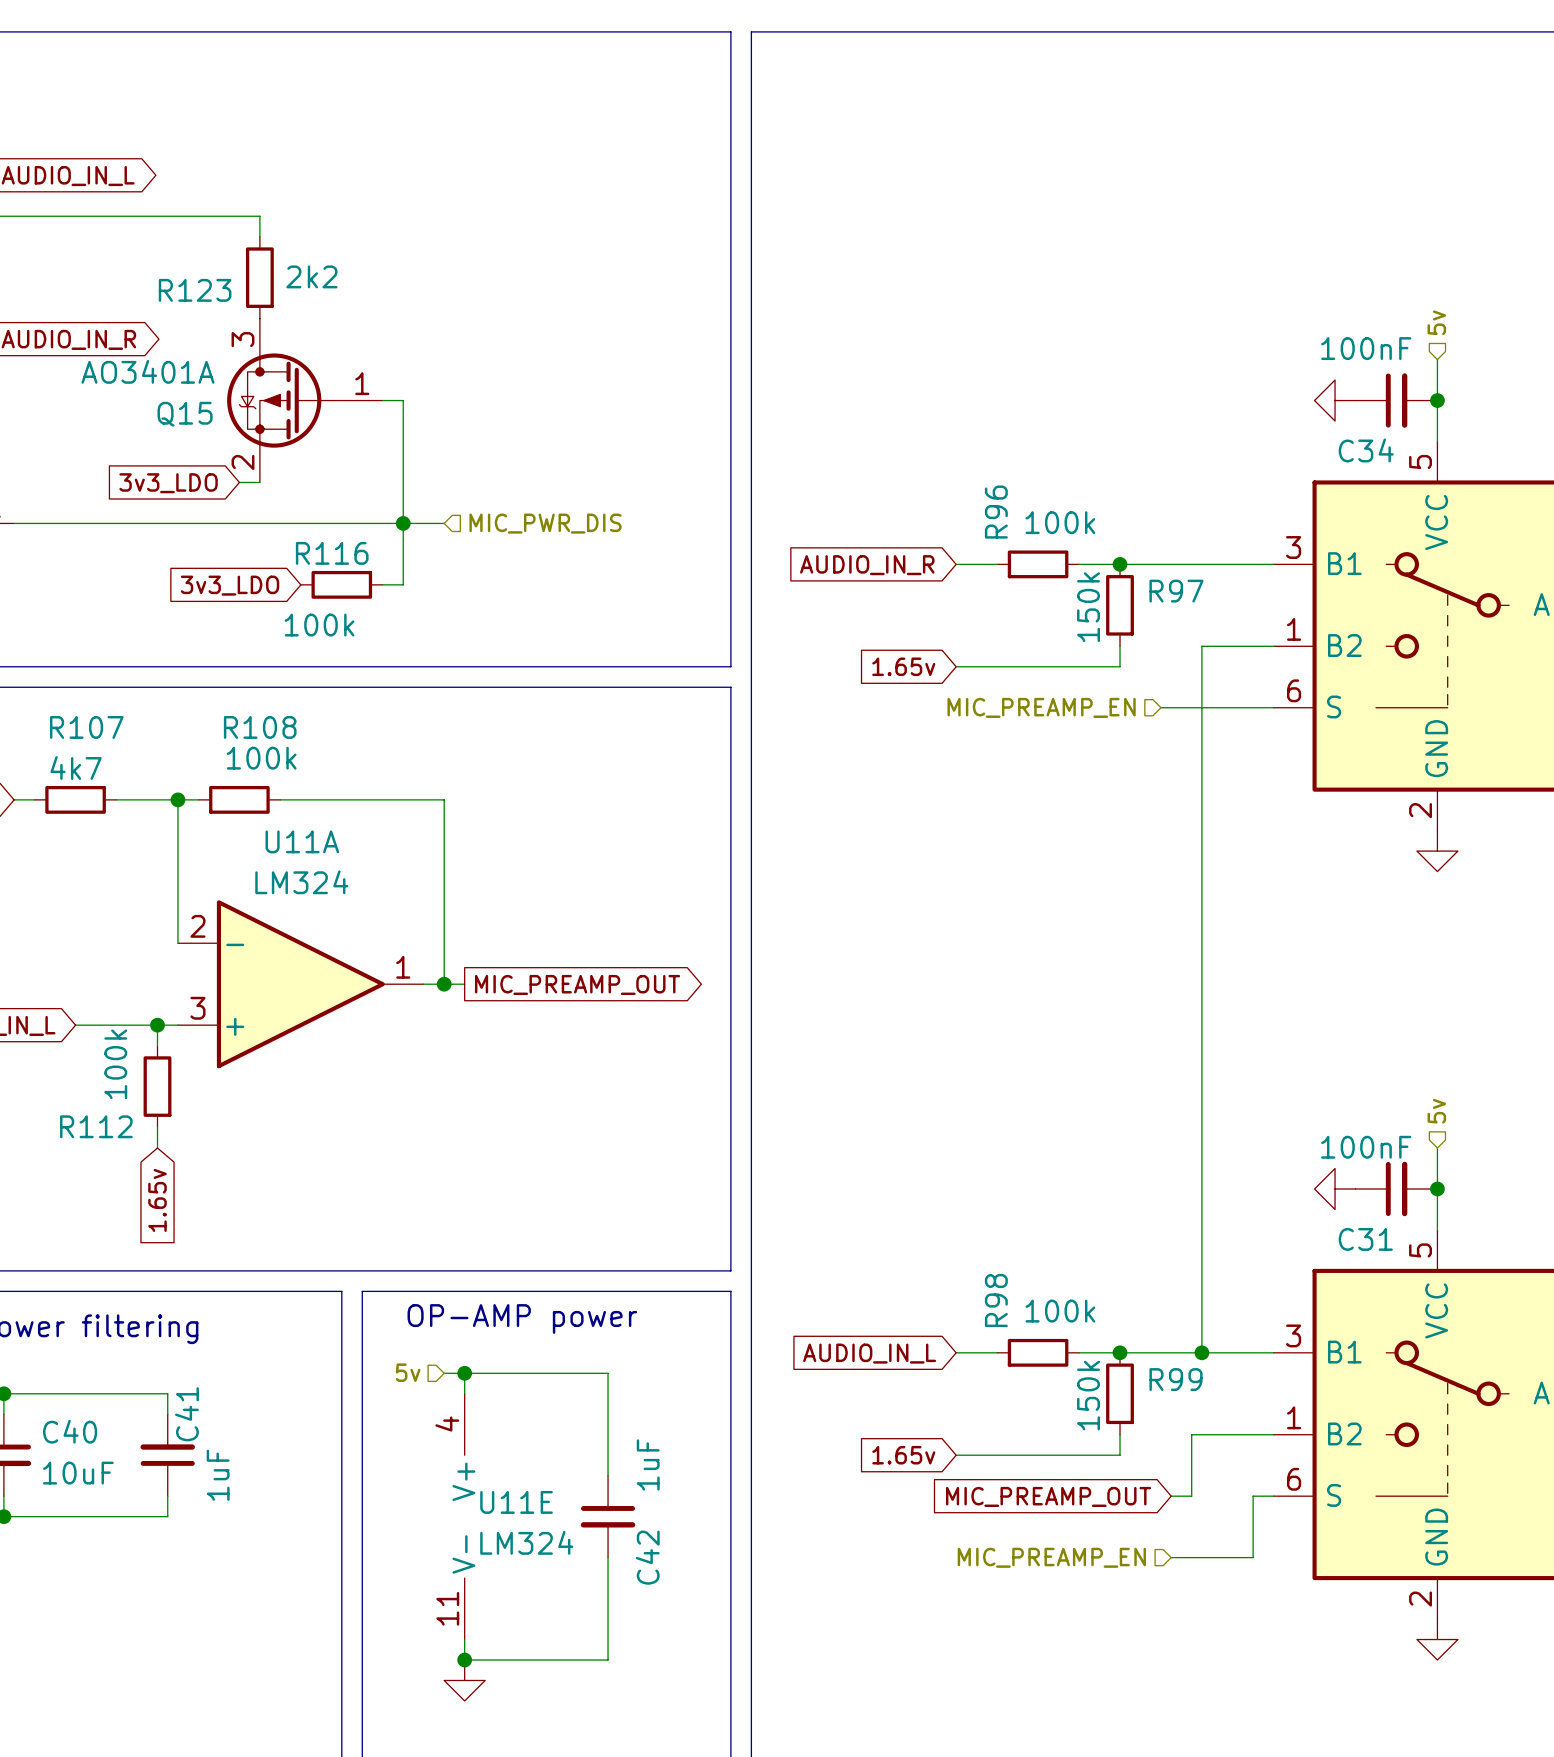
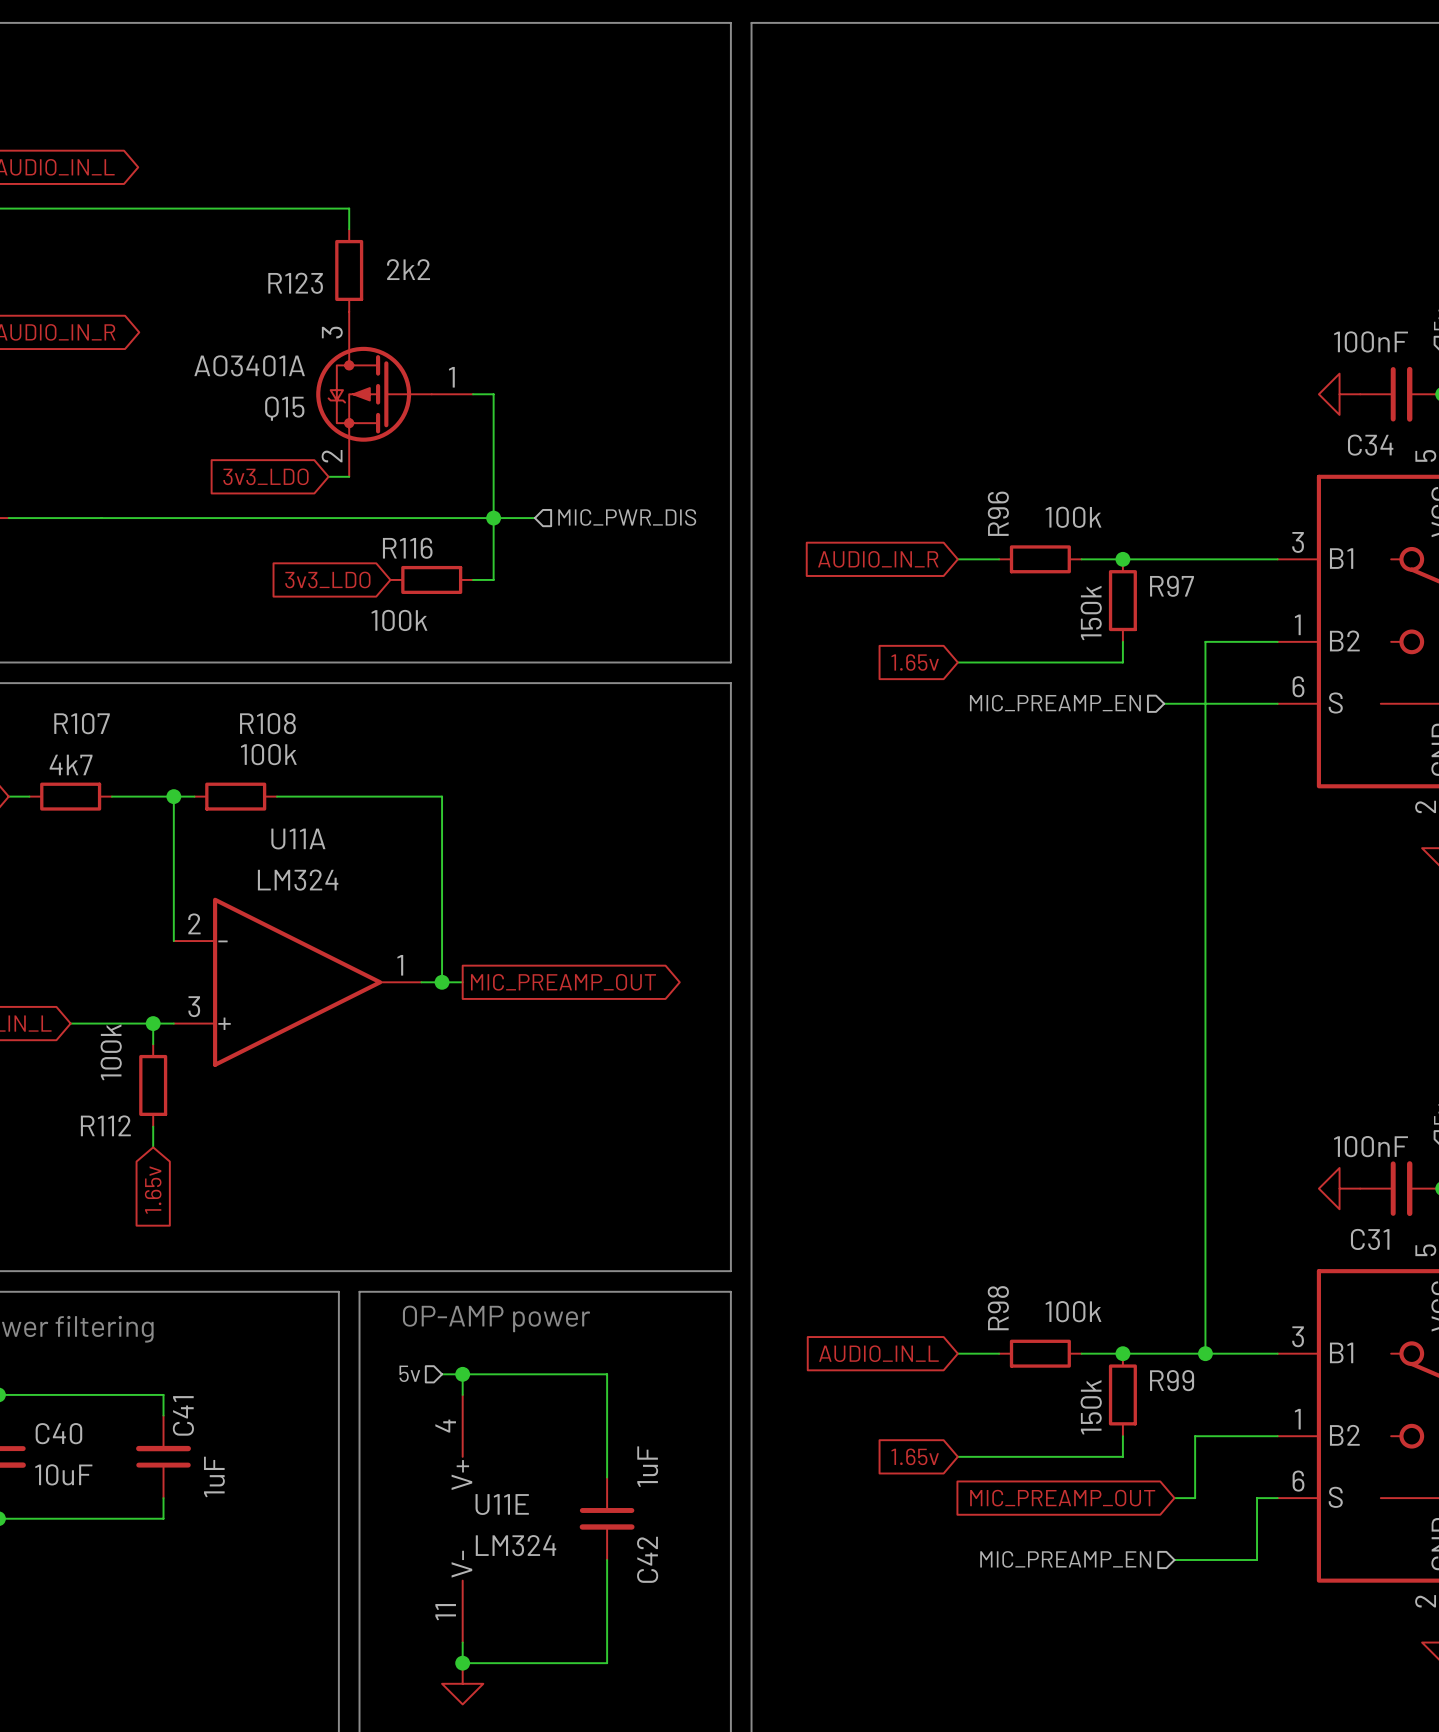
wire: (259, 216) (259, 236) -> (256, 208) (349, 208) (349, 229)
R123 position: (259, 277) -> (349, 270)
Q15 position: (304, 400) -> (394, 394)
wire: (382, 400) (403, 400) (403, 584) (382, 584) -> (473, 394) (493, 394) (493, 579) (473, 579)
wire: (239, 482) (259, 482) -> (328, 476) (349, 476)
global label position: 3v3_LDO (168, 483) -> 3v3_LDO (265, 476)
junction position: (403, 523) -> (493, 518)
wire: none -> (442, 518) (534, 518)
hierarchical label position: MIC_PWR_DIS (545, 523) -> MIC_PWR_DIS (627, 517)
R116 position: (341, 584) -> (431, 579)
global label position: 3v3_LDO (230, 585) -> 3v3_LDO (327, 579)

